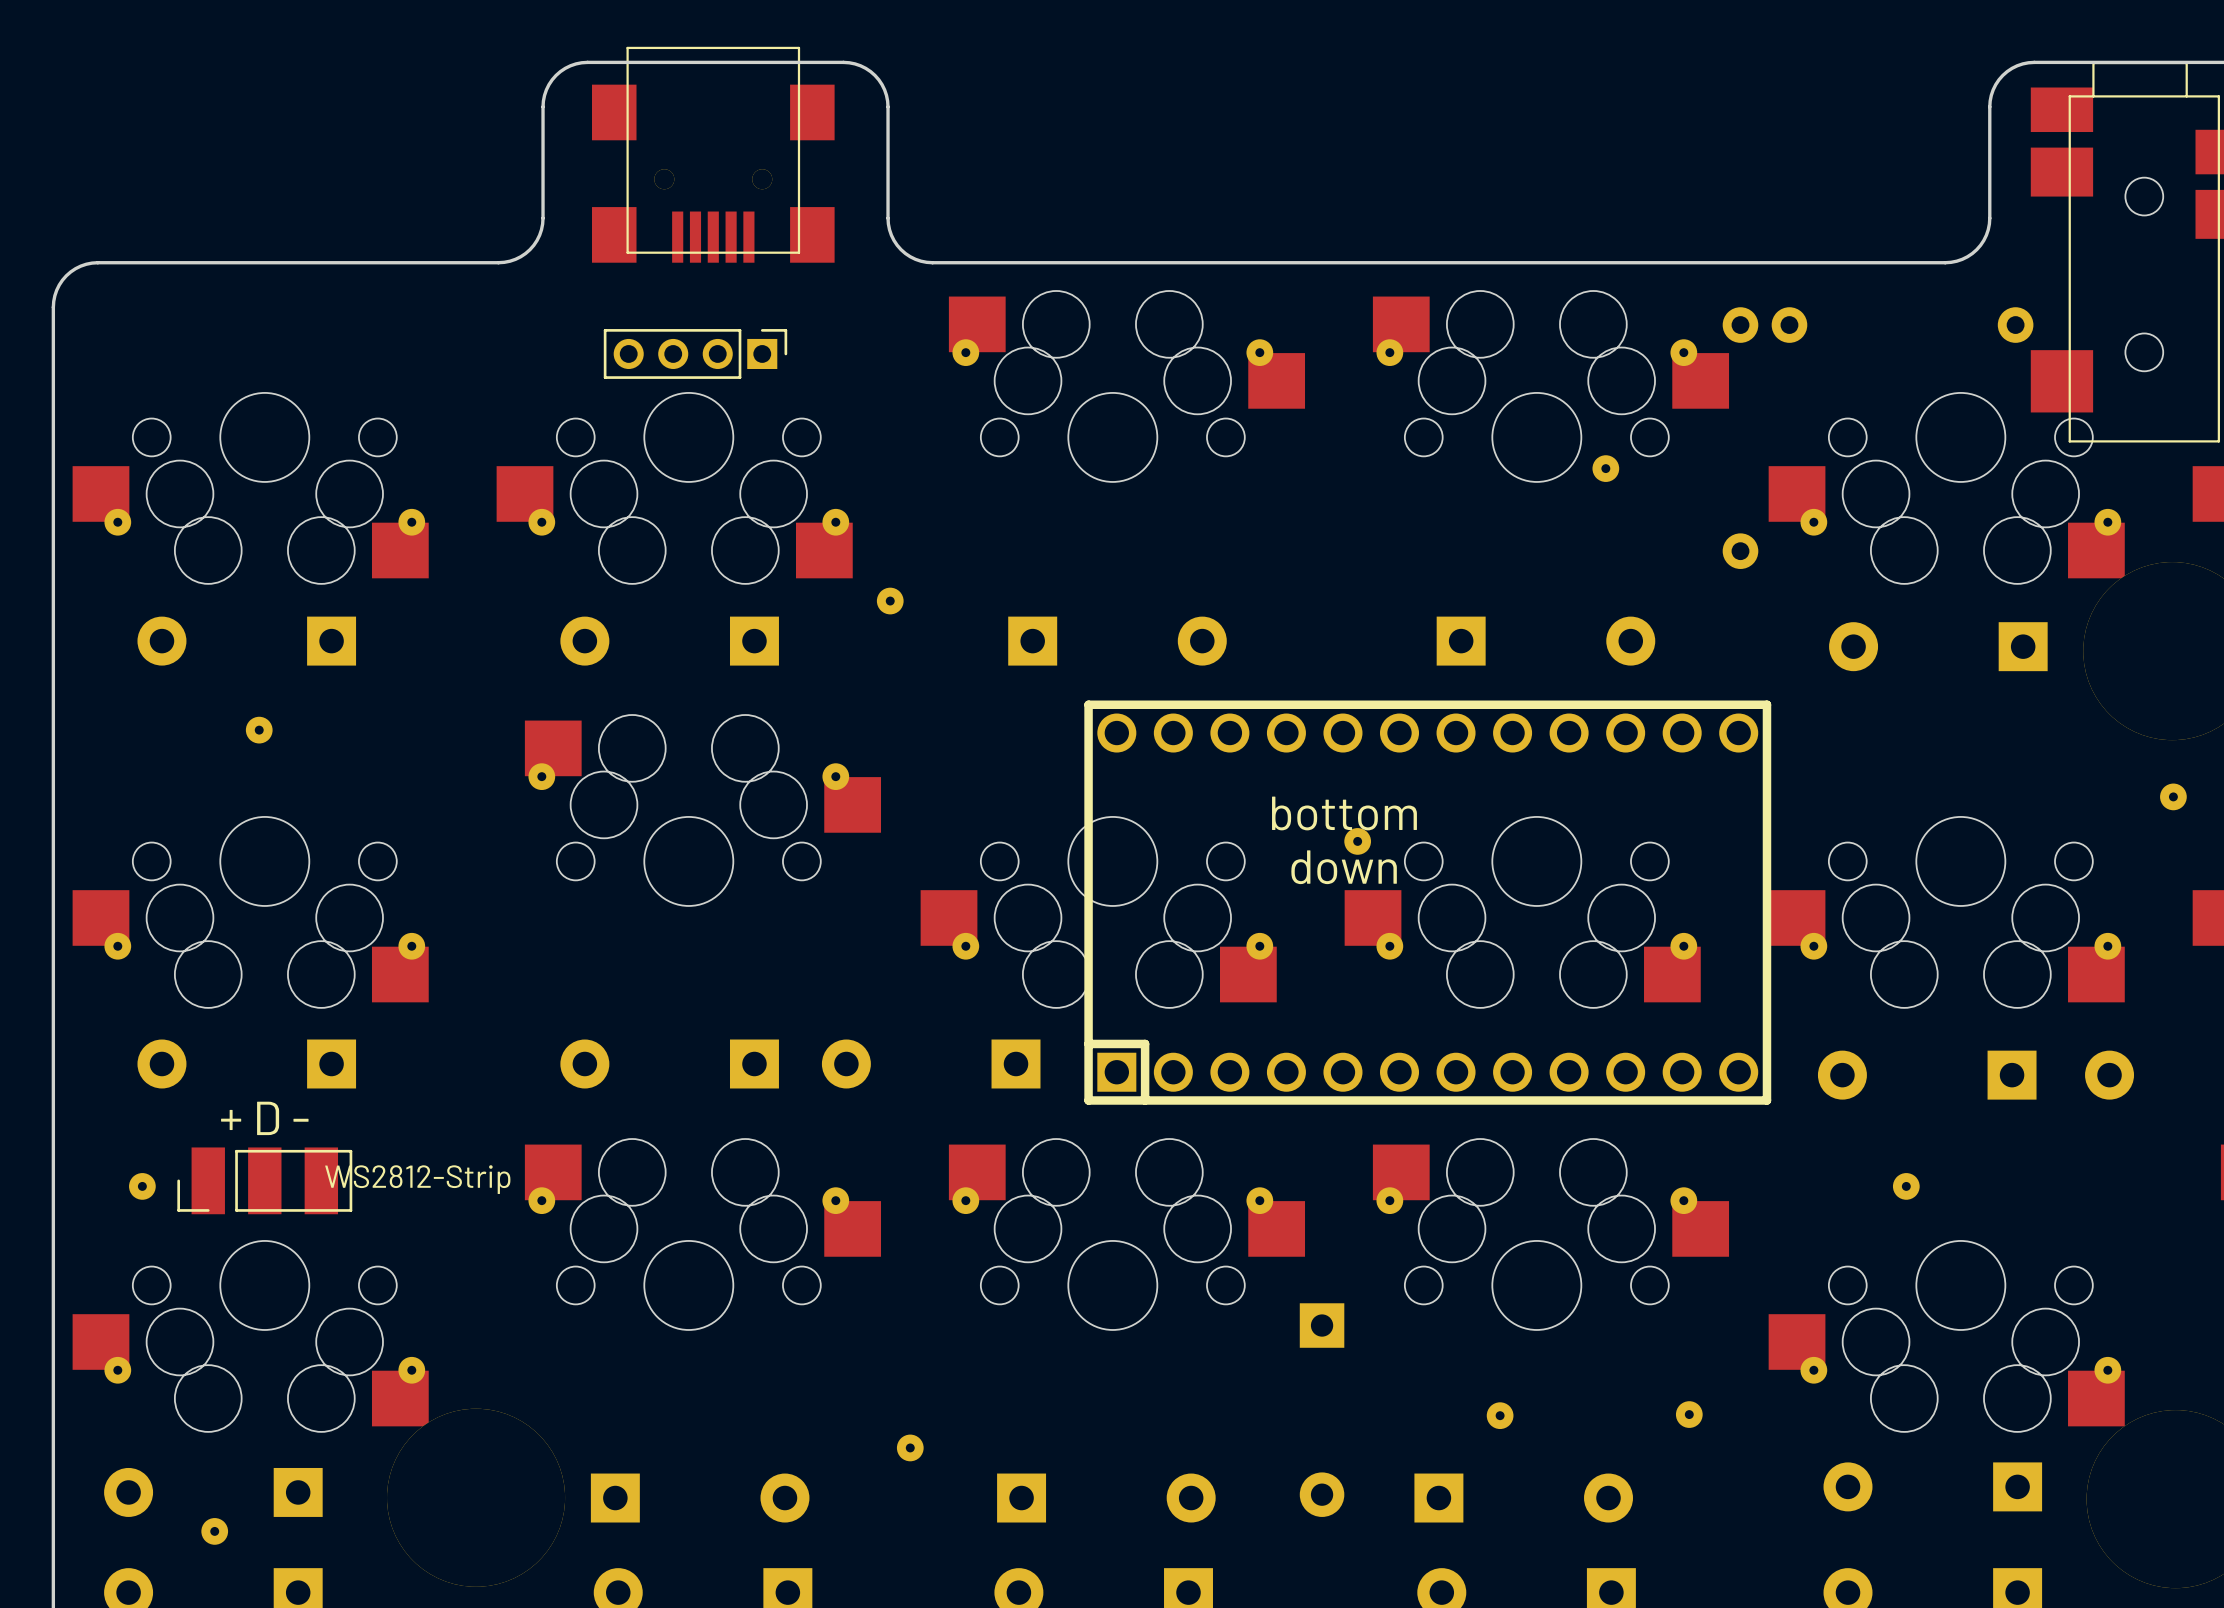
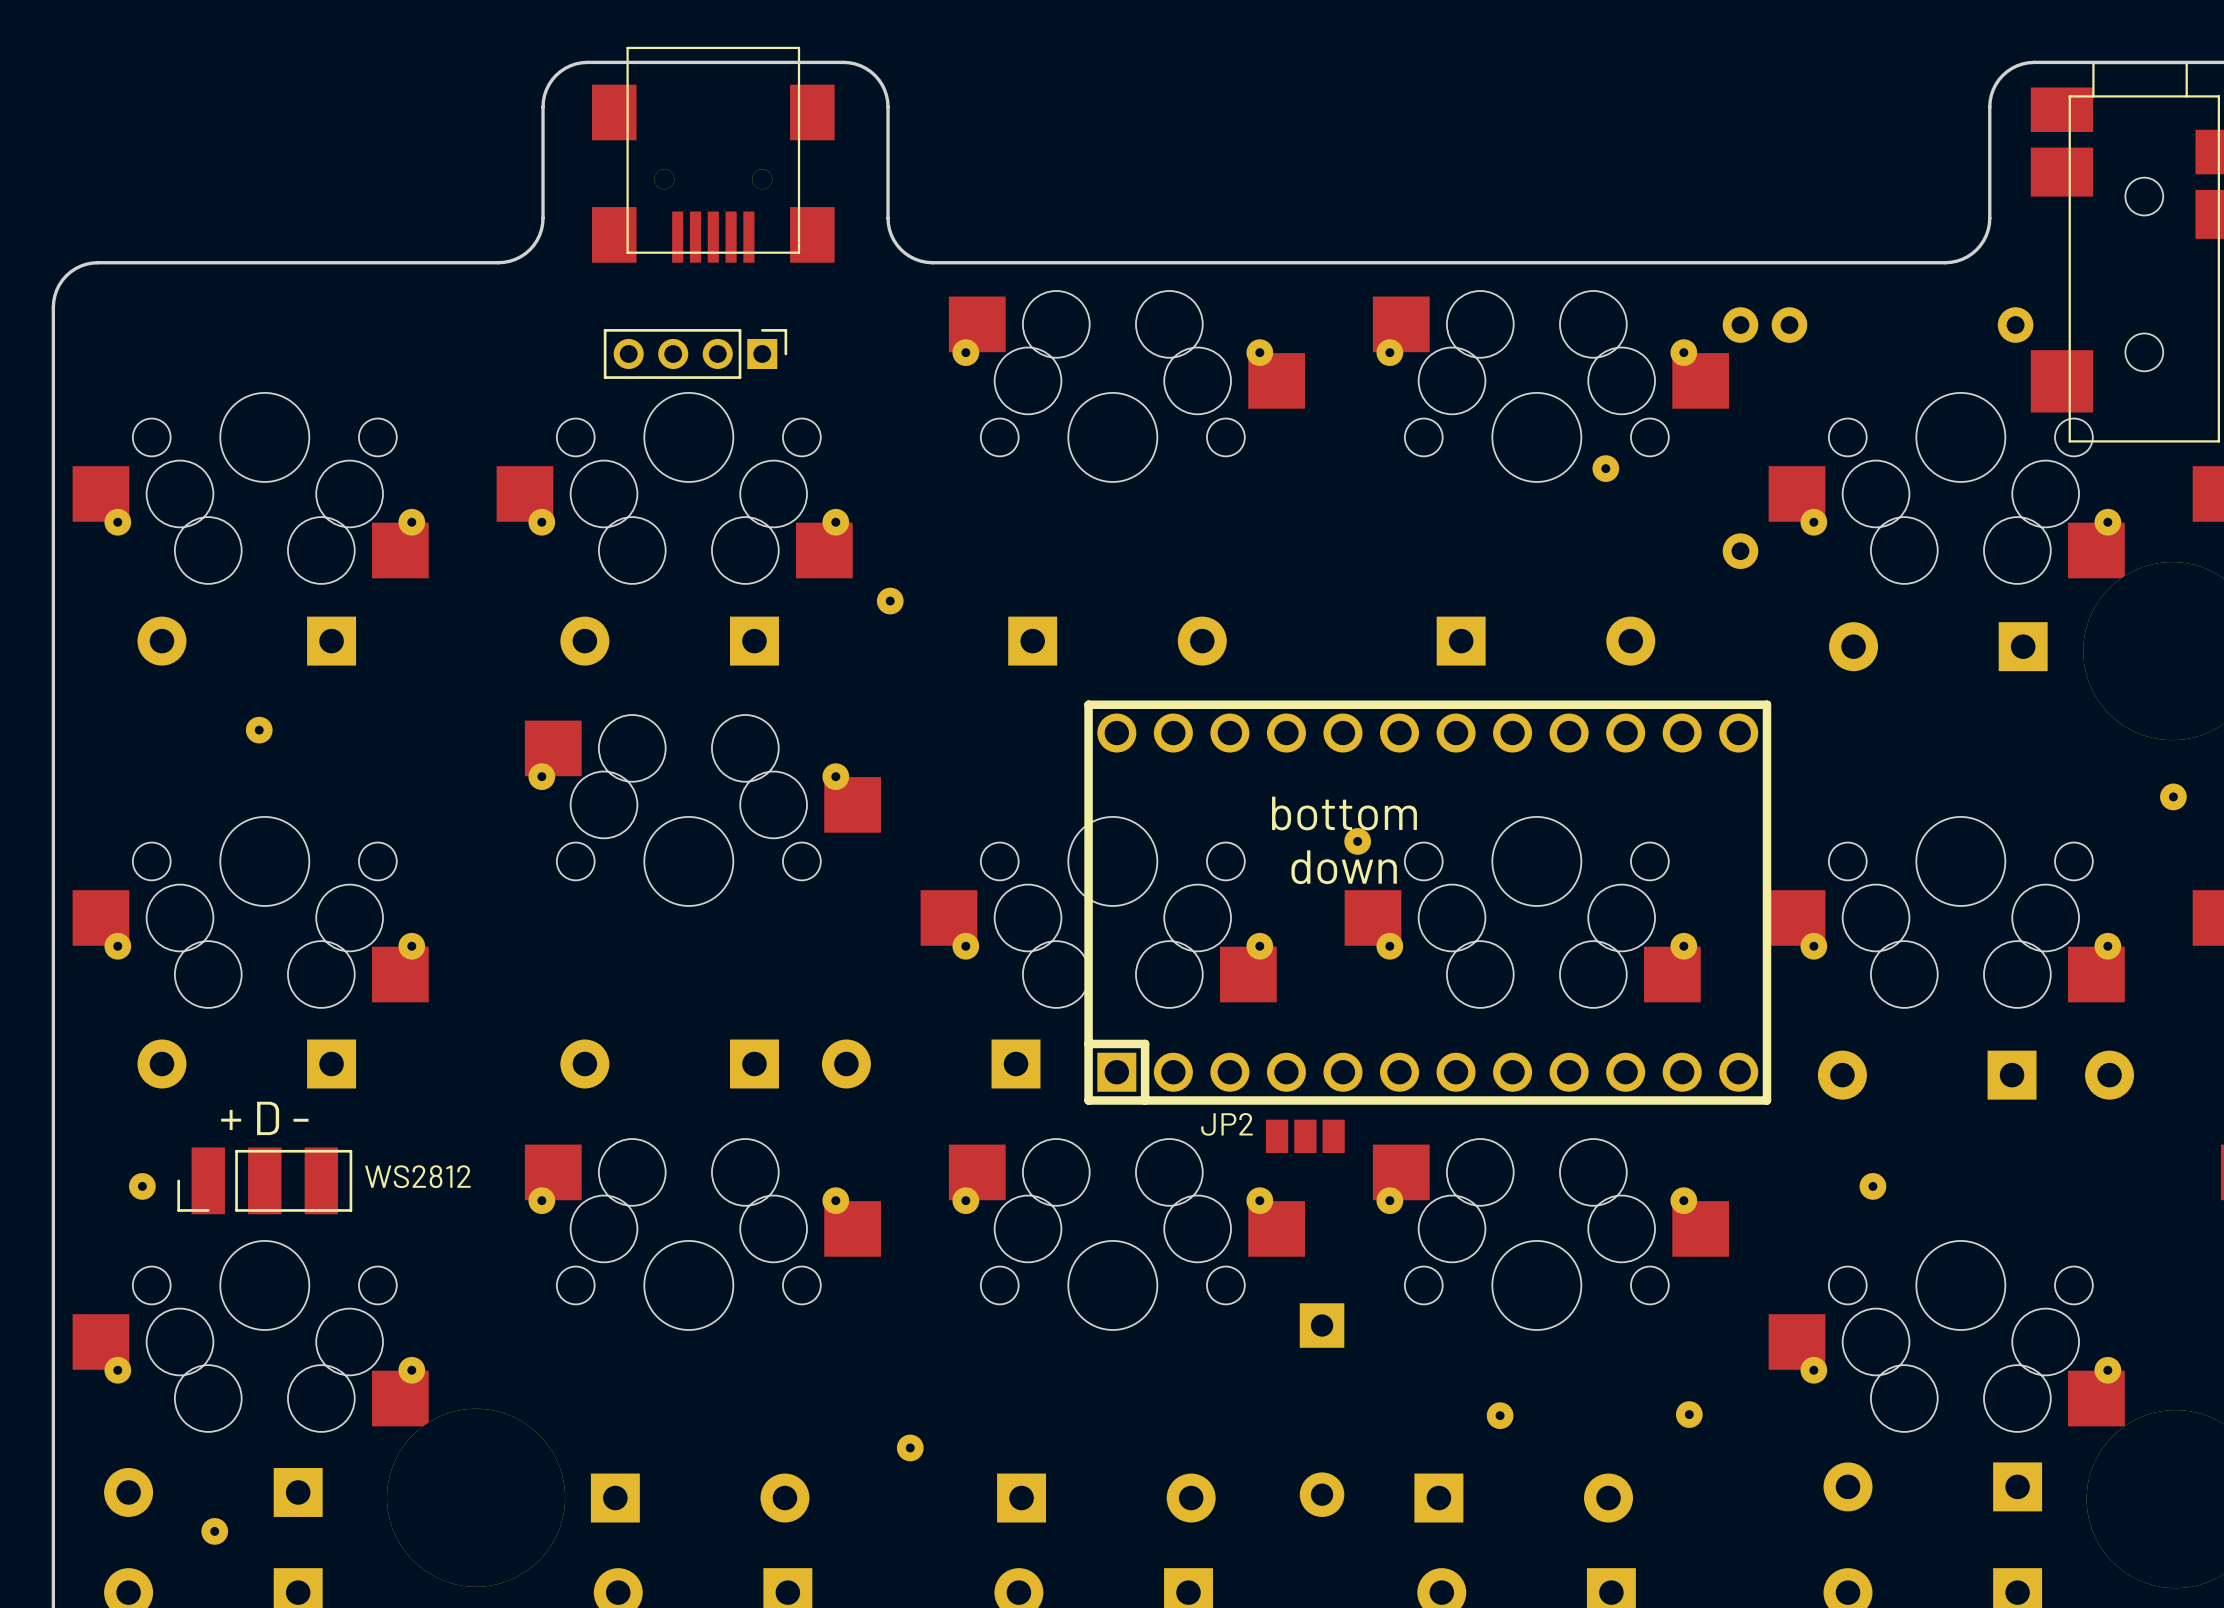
JP2: none -> (1305, 1136)
part value: WS2812-Strip (417, 1179) -> WS2812 (417, 1176)
part position: (1906, 1186) -> (1872, 1186)

